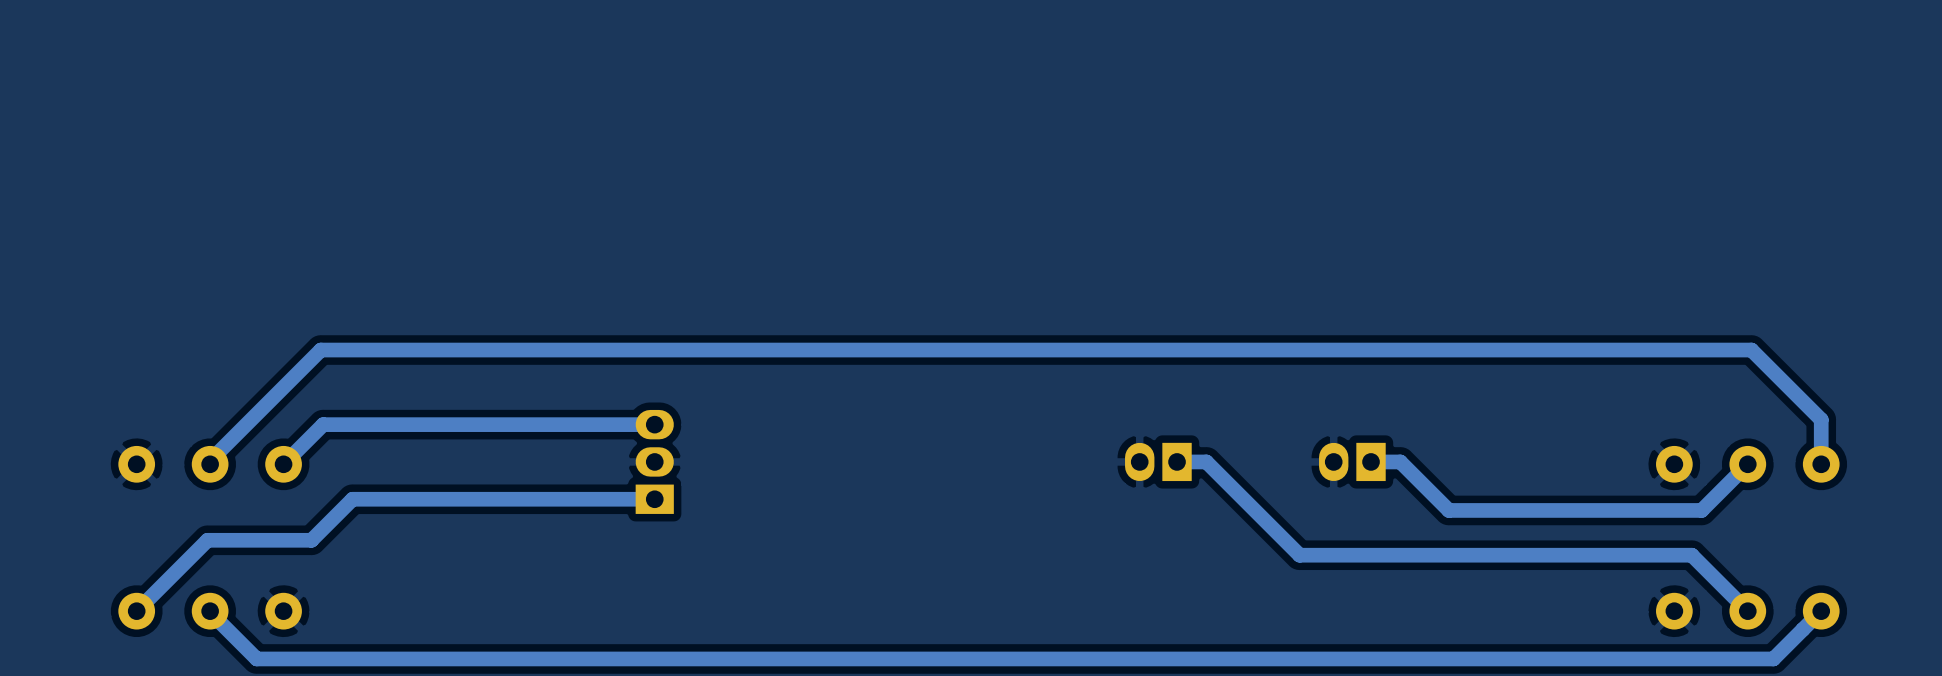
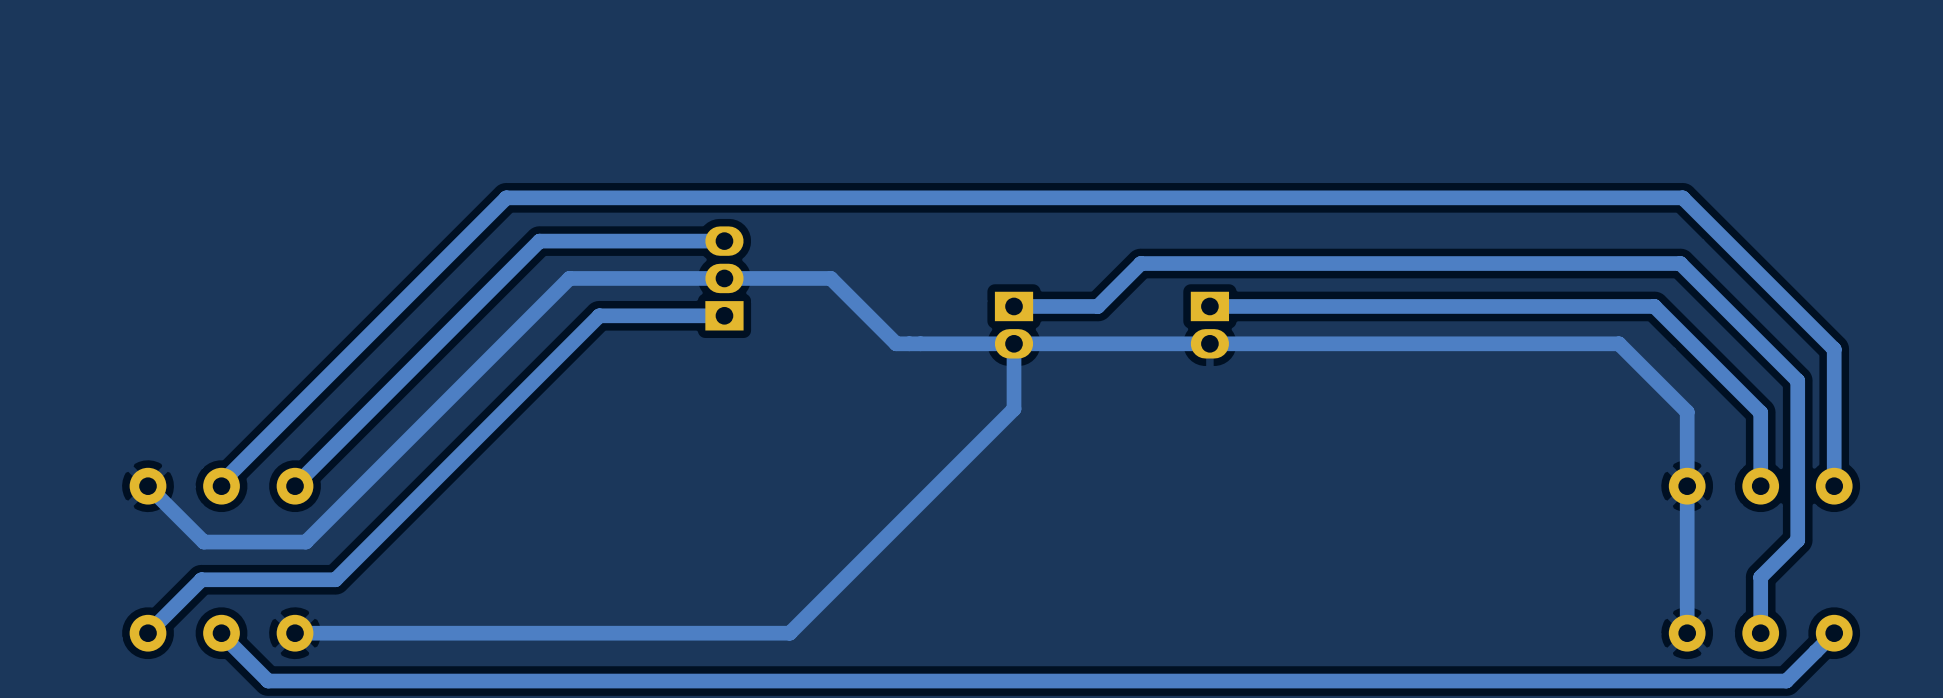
part: none -> (1014, 325)
part: none -> (1209, 325)
track: none -> (1014, 343) (1014, 409) (789, 633) (295, 633)
track: (320, 350) (1751, 350) (1821, 419) -> (332, 371) (506, 197) (1682, 197) (1834, 349) (1834, 441)
track: (654, 424) (323, 424) (283, 464) -> (724, 241) (539, 241) (295, 486)
part position: (654, 461) -> (724, 278)
part: (1158, 461) -> none
track: (1177, 461) (1206, 461) (1299, 555) (1691, 555) (1747, 611) -> (1014, 306) (1097, 306) (1140, 263) (1680, 263) (1797, 380) (1797, 540) (1760, 577) (1760, 633)
part: (1352, 461) -> none
track: (1371, 461) (1400, 461) (1448, 510) (1701, 510) (1747, 464) -> (1209, 306) (1654, 306) (1760, 412) (1760, 486)
track: none -> (148, 486) (203, 542) (305, 542) (569, 278) (830, 278) (896, 343) (1618, 343) (1687, 412) (1687, 633)
track: (654, 499) (352, 499) (311, 540) (207, 540) (190, 557) -> (724, 315) (599, 315) (335, 579) (201, 579)

